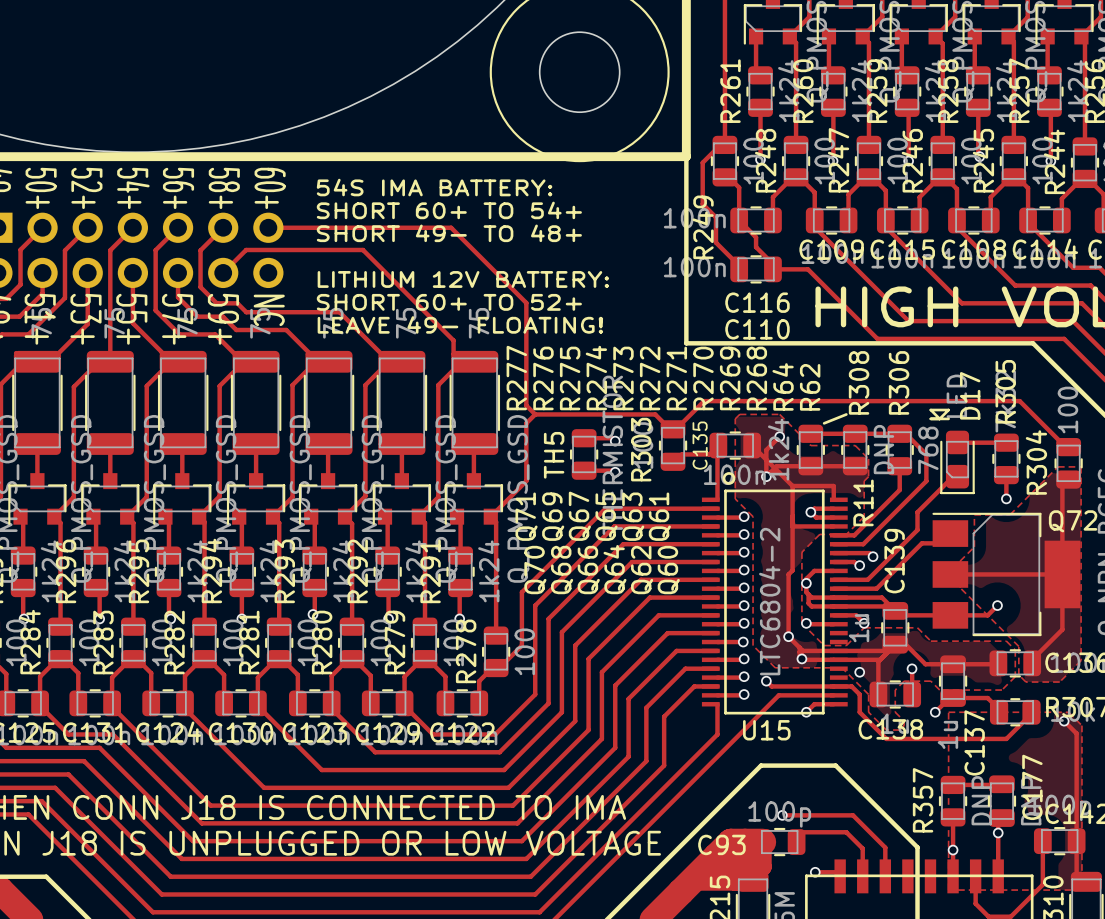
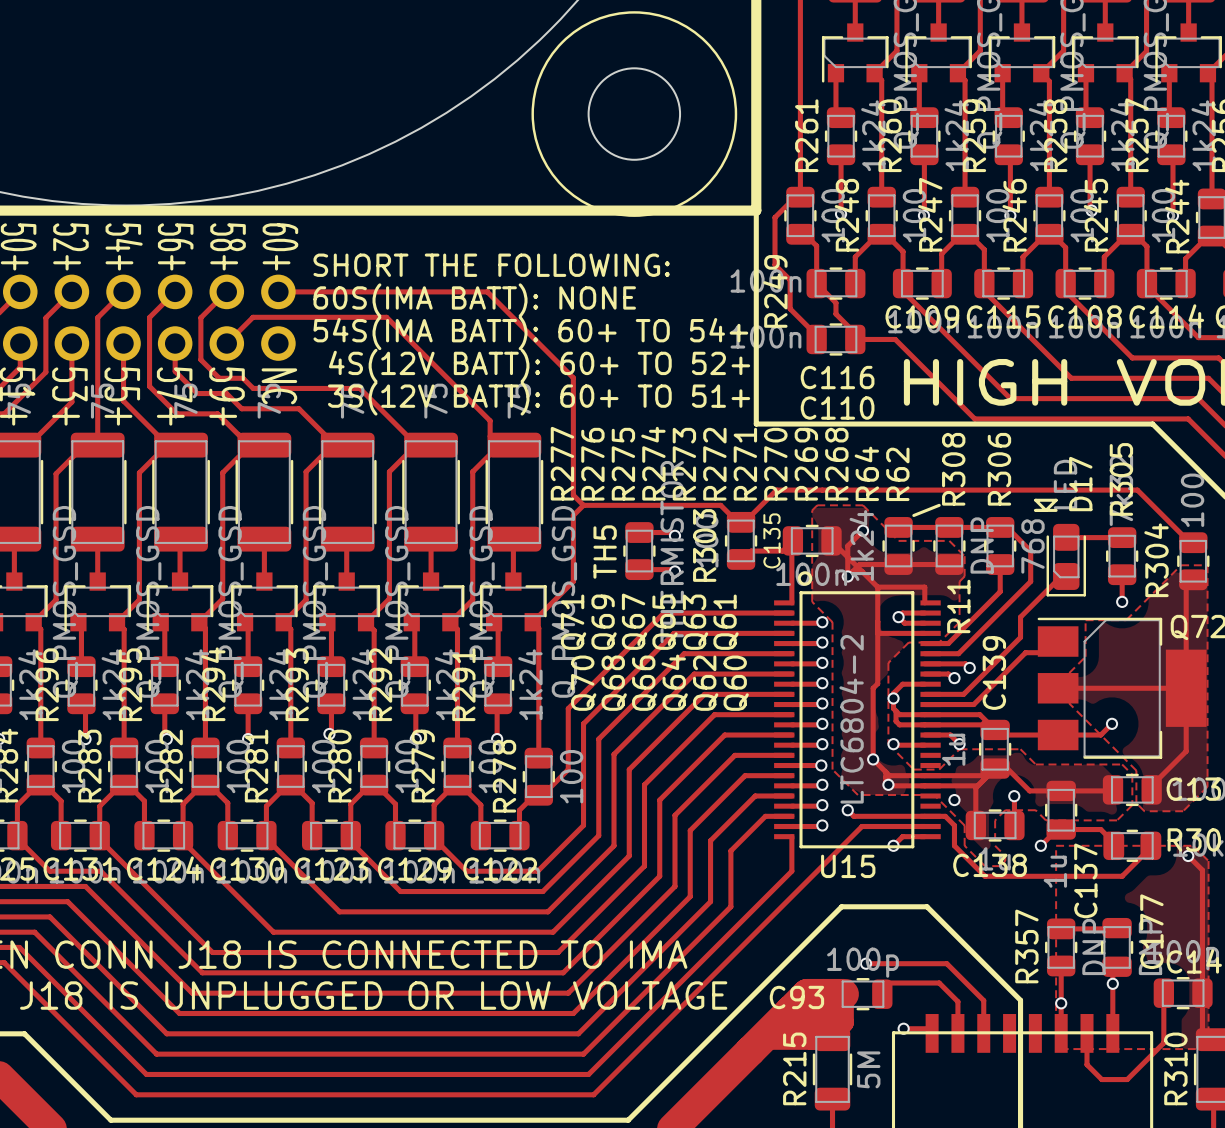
text: 54S IMA BATTERY: (434, 187) -> none
text: none -> SHORT THE FOLLOWING: (491, 265)
text: SHORT 60+ TO 54+ (449, 210) -> none
text: SHORT 49- TO 48+ (449, 233) -> none
text: none -> 60S(IMA BATT): NONE (474, 300)
text: none -> 54S(IMA BATT): 60+ TO 54+ (530, 333)
text: LITHIUM 12V BATTERY: (463, 279) -> none
text: SHORT 60+ TO 52+ (449, 302) -> 4S(12V BATT): 60+ TO 52+ (539, 365)
text: none -> 3S(12V BATT): 60+ TO 51+ (539, 398)
text: LEAVE 49- FLOATING! (460, 324) -> none

